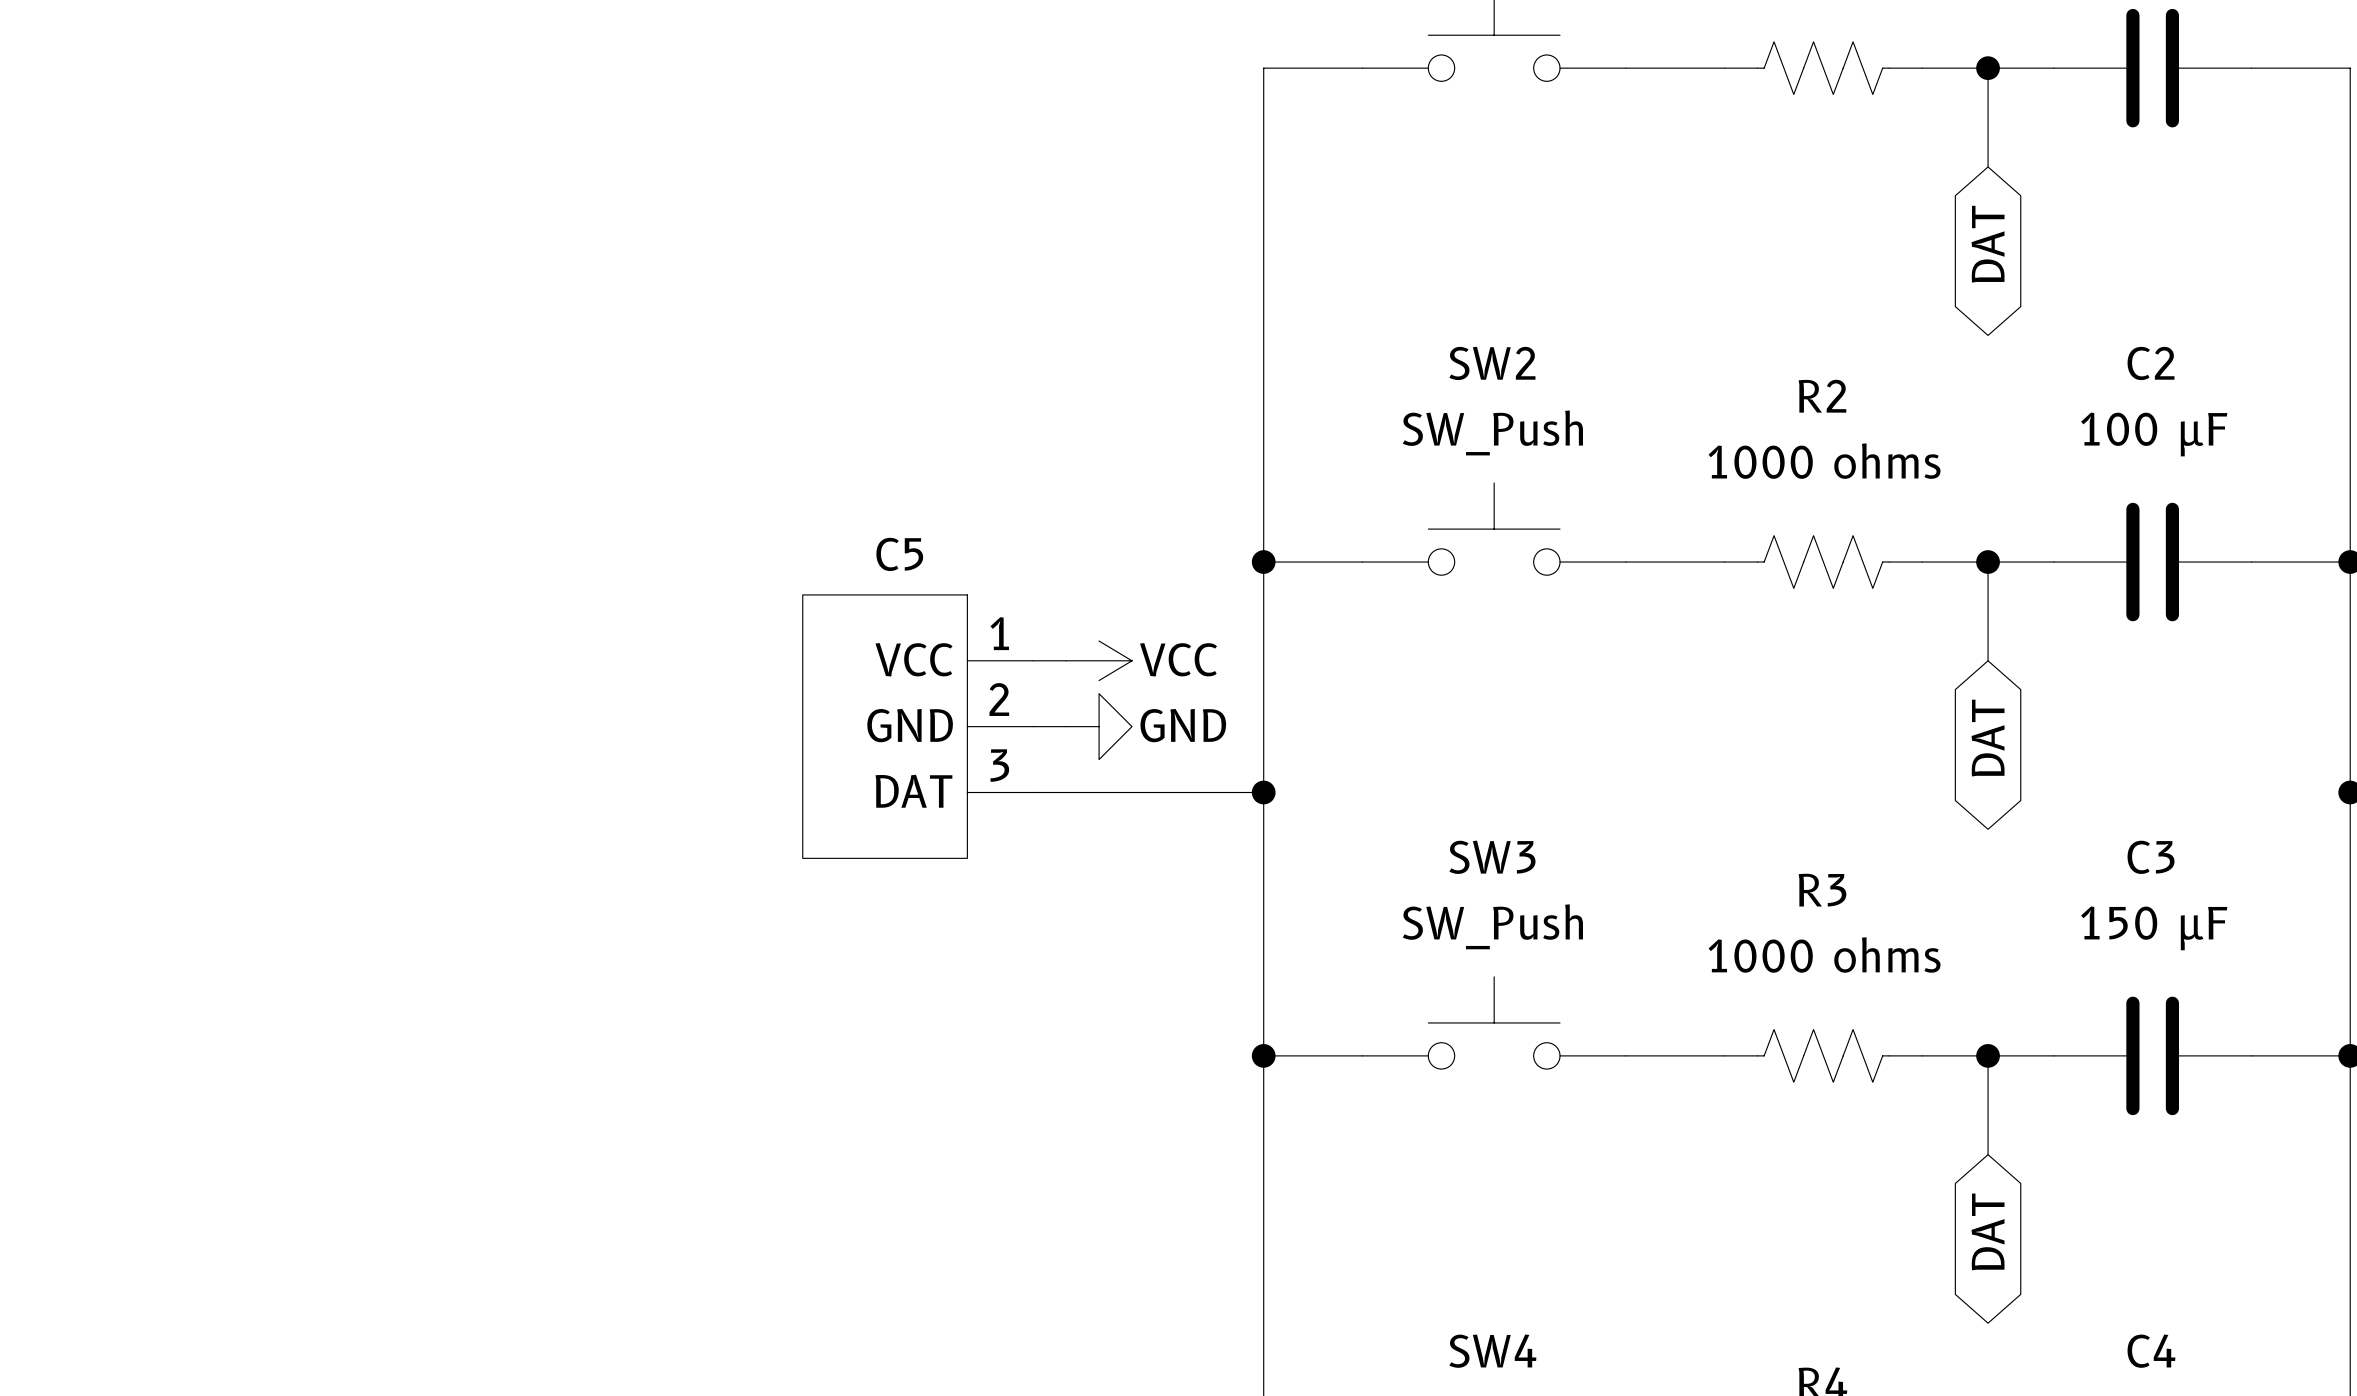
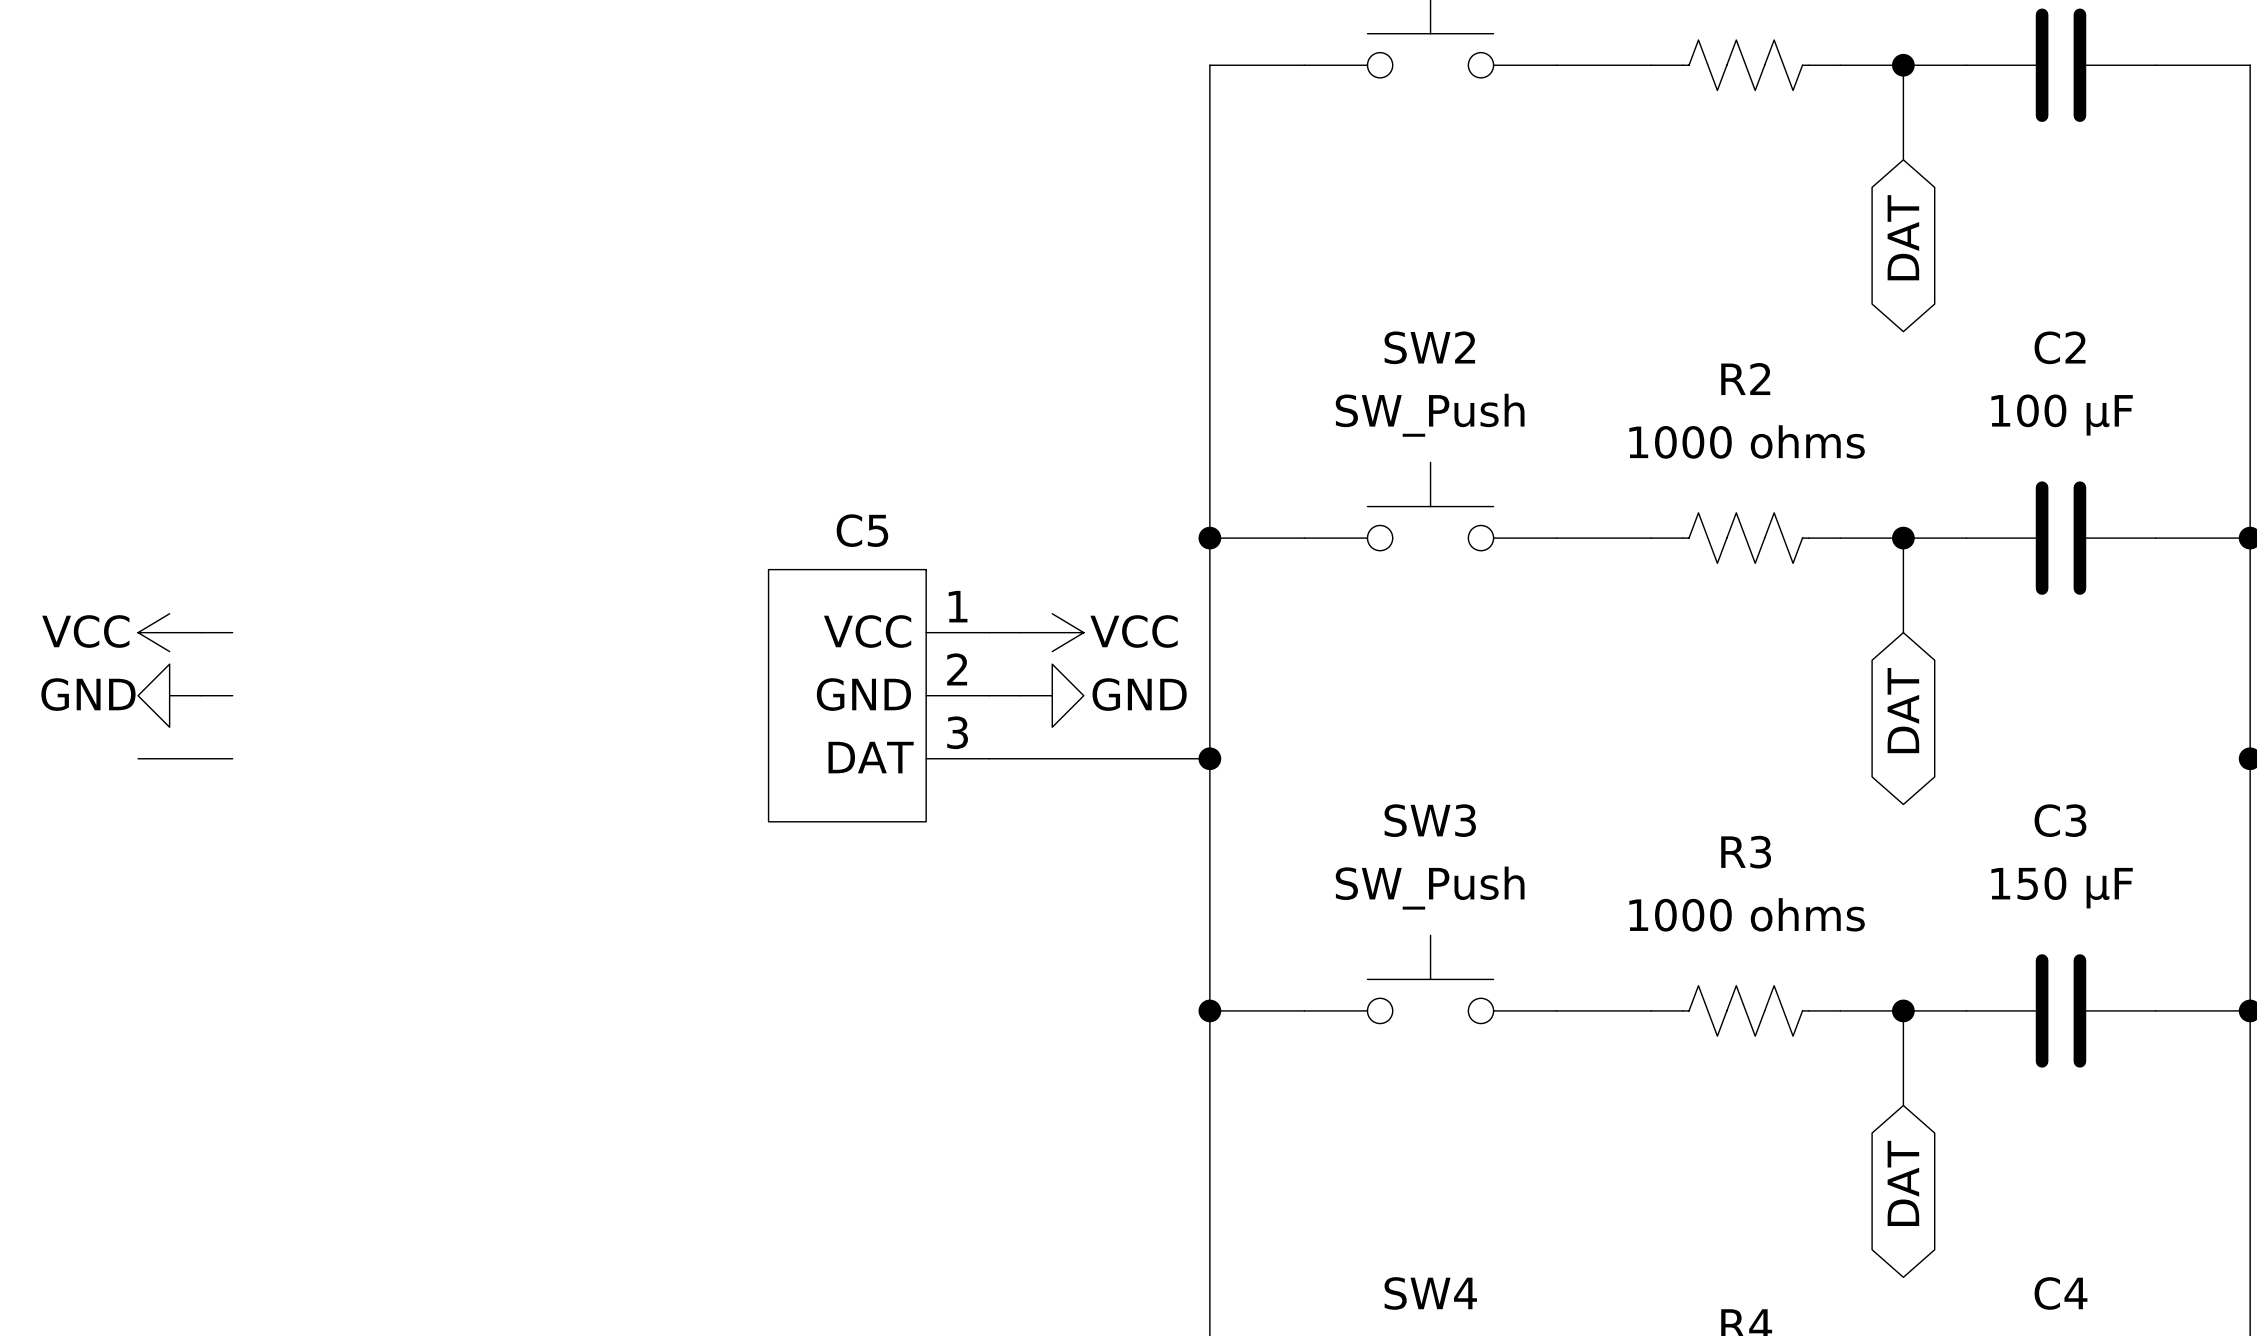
power symbol: none -> VCC (169, 632)
wire: none -> (201, 632) (232, 632)
power symbol: none -> GND (169, 695)
wire: none -> (201, 695) (232, 695)
wire: none -> (138, 758) (232, 758)

